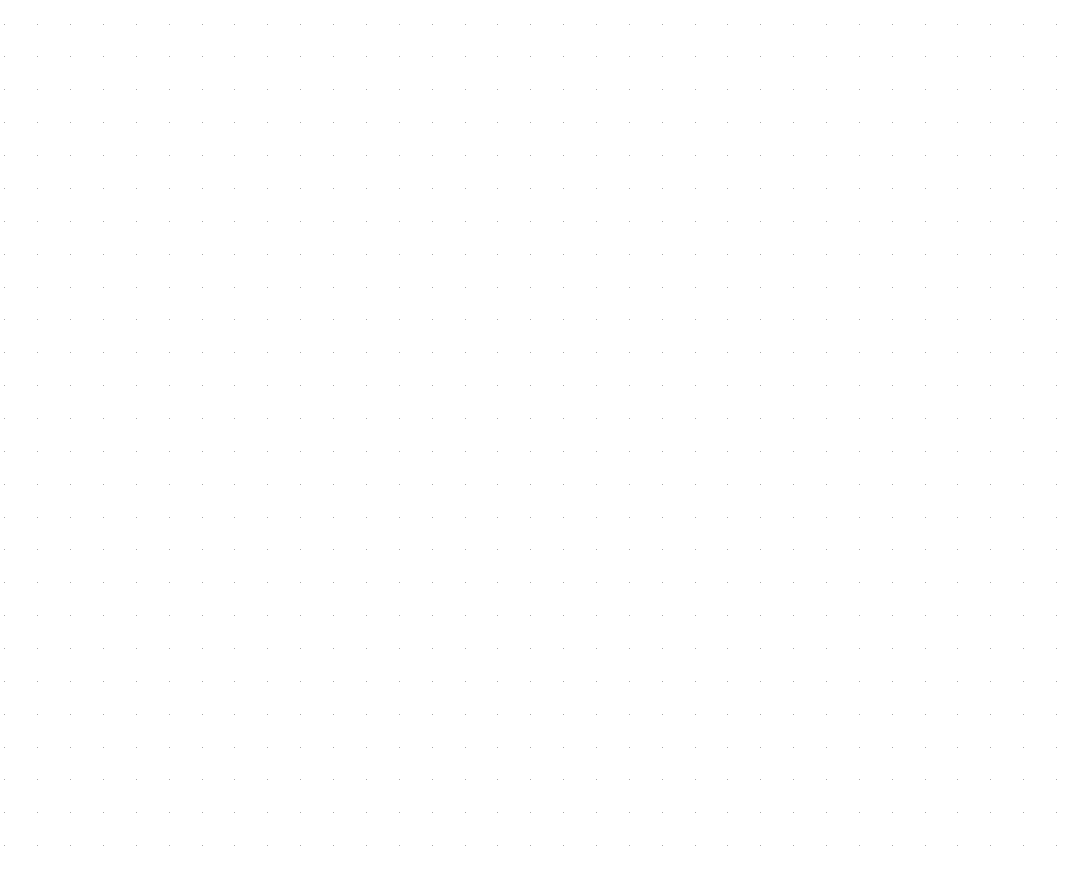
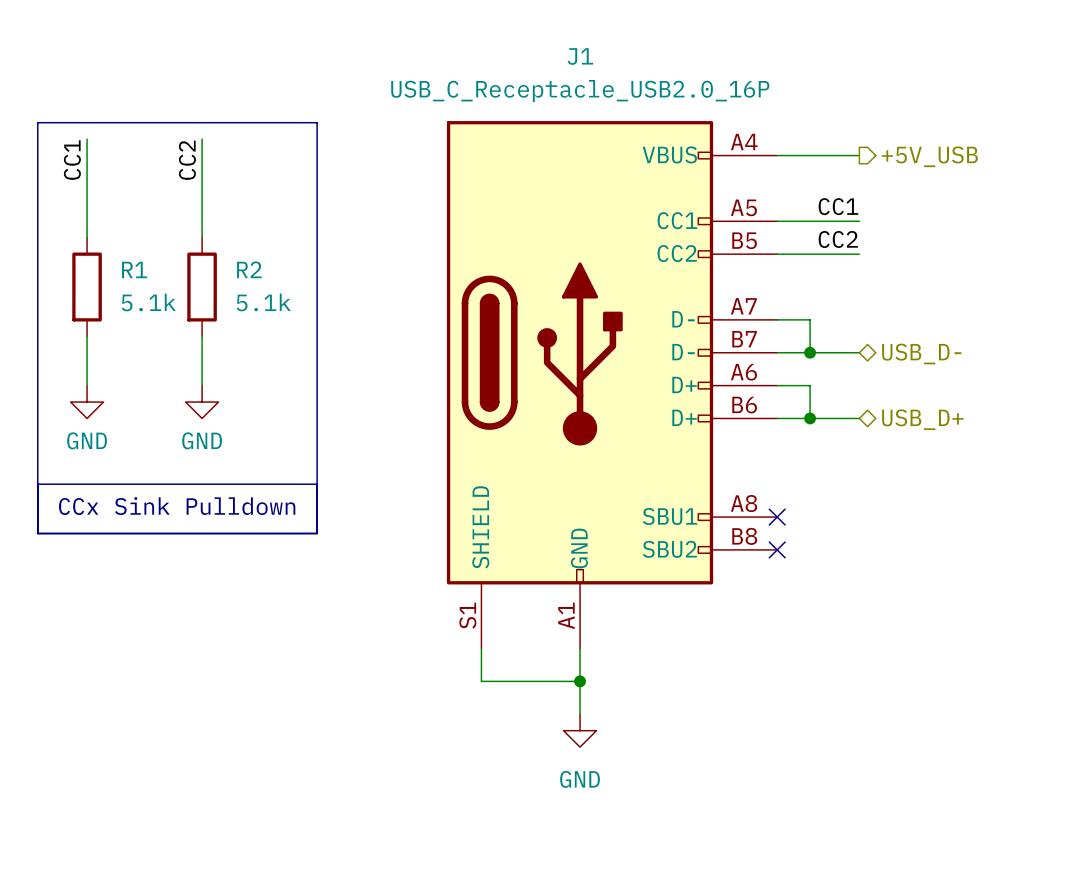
line: none -> (37, 122) (317, 122) (317, 533) (37, 533) (37, 122)
wire: none -> (87, 139) (87, 237)
wire: none -> (202, 139) (202, 237)
wire: none -> (777, 155) (859, 155)
hierarchical label: none -> +5V_USB (929, 156)
label: none -> CC1 (72, 160)
label: none -> CC2 (187, 160)
label: none -> CC1 (838, 206)
wire: none -> (777, 221) (859, 221)
label: none -> CC2 (838, 239)
wire: none -> (777, 254) (859, 254)
R1: none -> 5.1k (87, 287)
R2: none -> 5.1k (202, 287)
wire: none -> (777, 319) (810, 319) (810, 352)
wire: none -> (87, 336) (87, 385)
wire: none -> (202, 336) (202, 385)
wire: none -> (777, 352) (859, 352)
junction: none -> (810, 352)
hierarchical label: none -> USB_D- (921, 353)
J1: none -> USB_C_Receptacle_USB2.0_16P (612, 384)
wire: none -> (777, 385) (810, 385) (810, 418)
power symbol: none -> GND (87, 402)
power symbol: none -> GND (202, 402)
wire: none -> (777, 418) (859, 418)
junction: none -> (810, 418)
hierarchical label: none -> USB_D+ (922, 419)
line: none -> (37, 484) (317, 484)
text: none -> CCx Sink Pulldown (177, 506)
no-connect mark: none -> (777, 517)
no-connect mark: none -> (777, 549)
wire: none -> (481, 648) (481, 681) (580, 681)
wire: none -> (580, 648) (580, 714)
junction: none -> (580, 681)
power symbol: none -> GND (580, 730)

